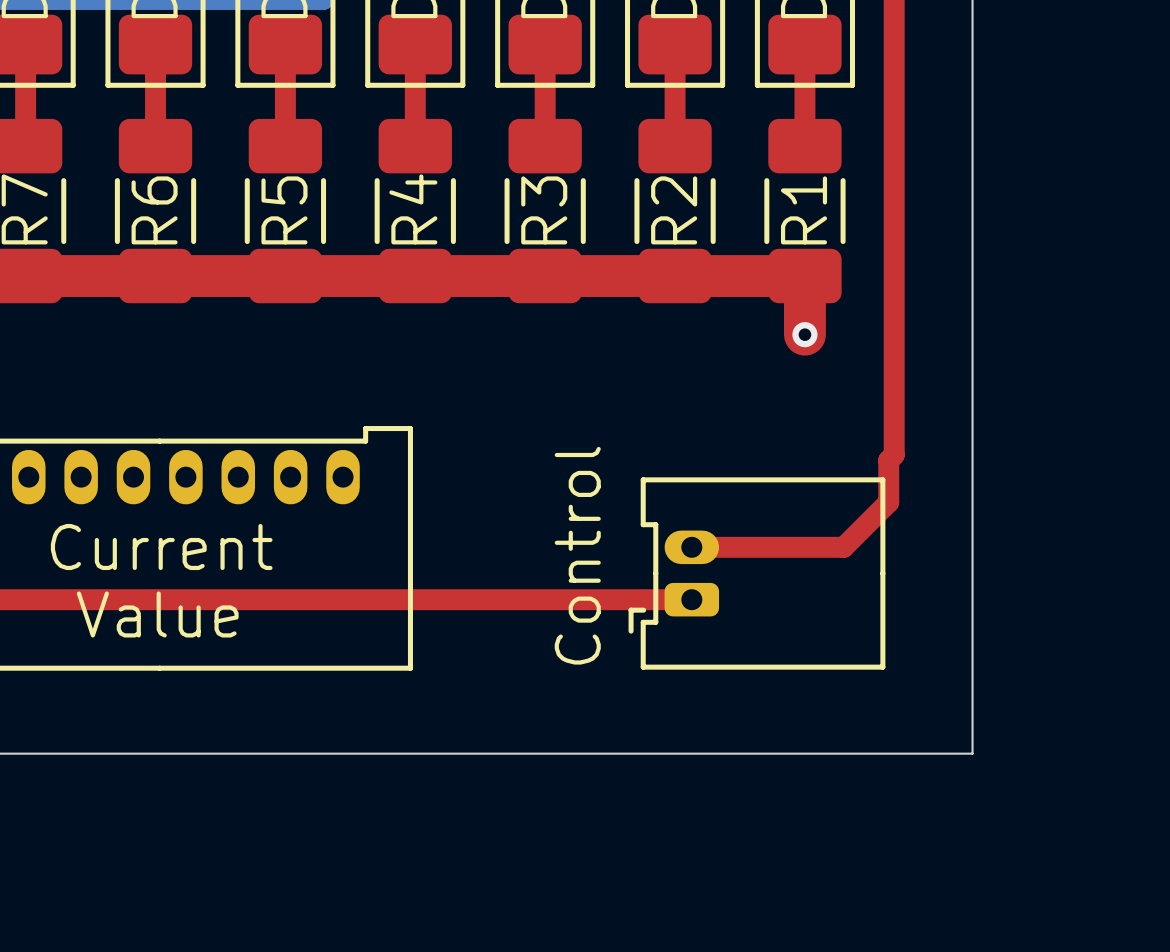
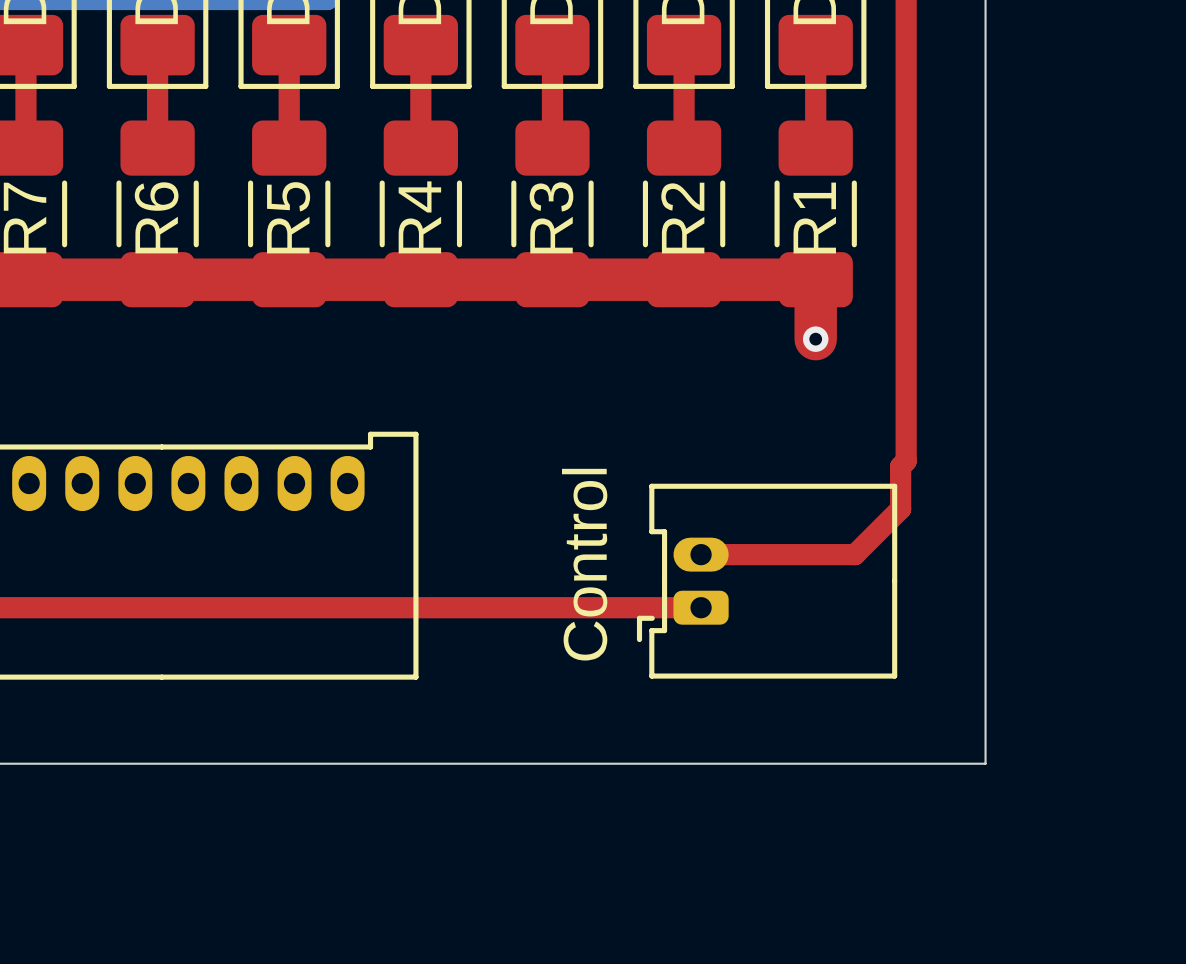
text: Current (161, 547) -> none
text: Value (157, 614) -> none

